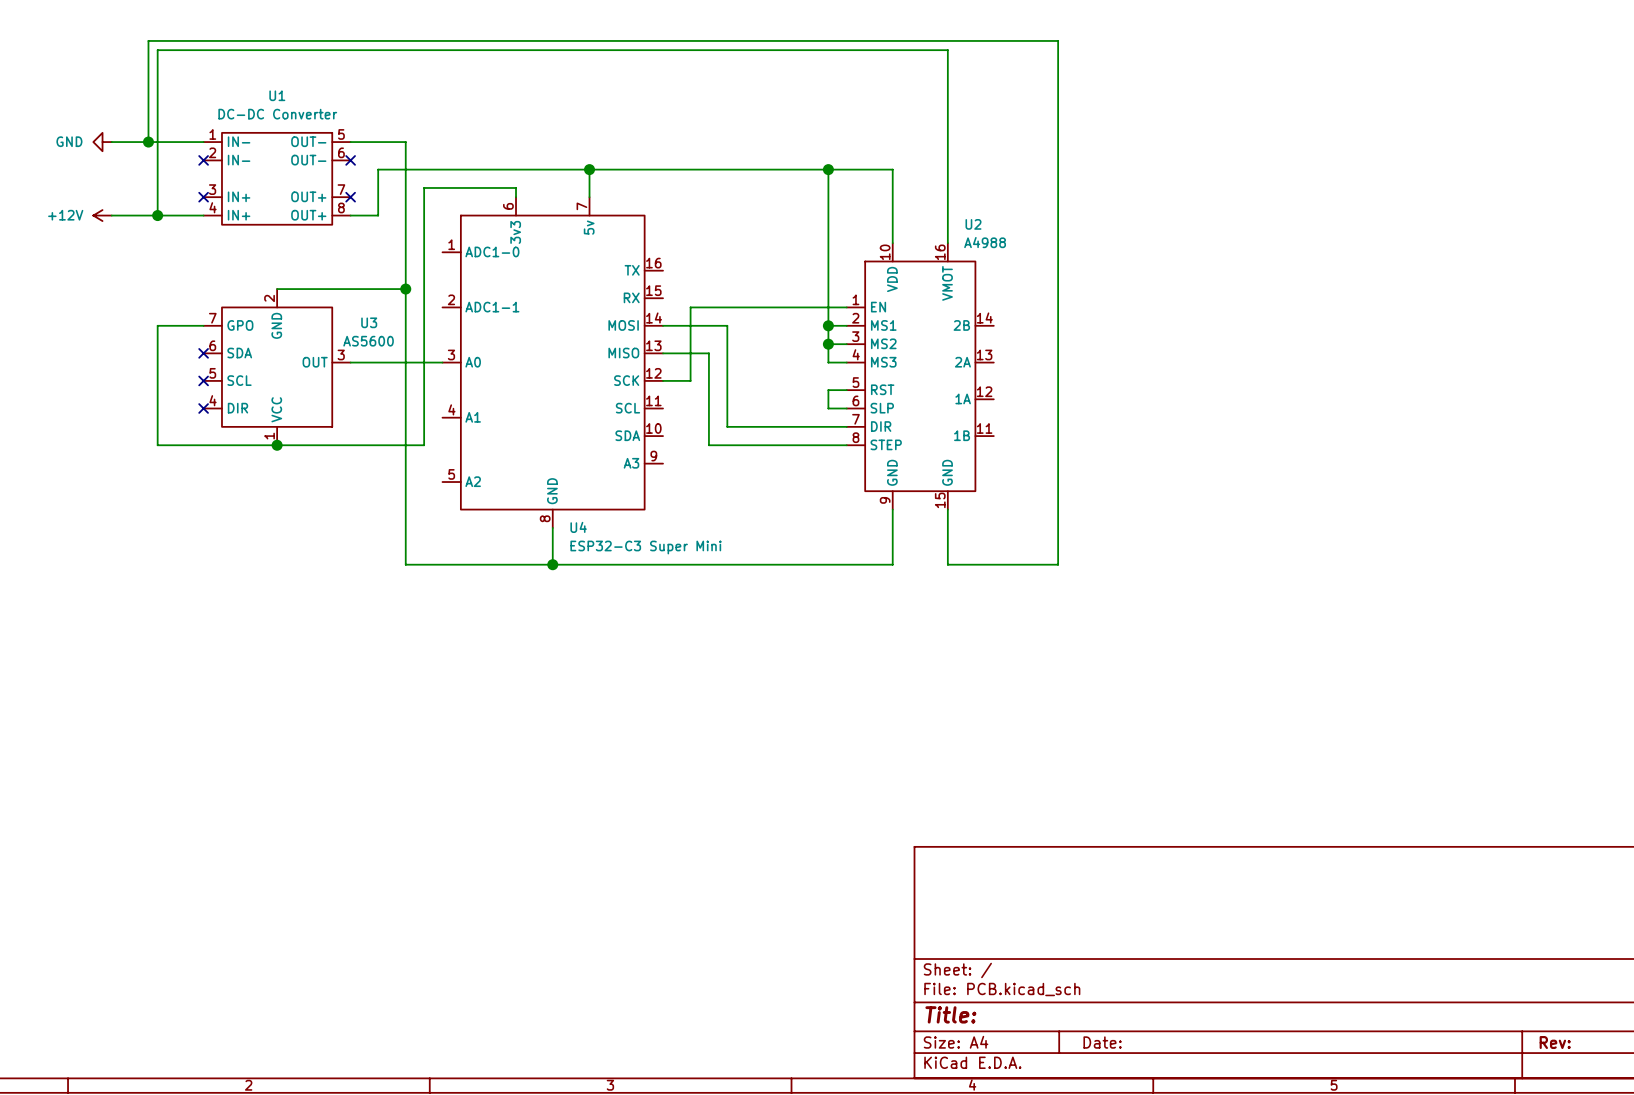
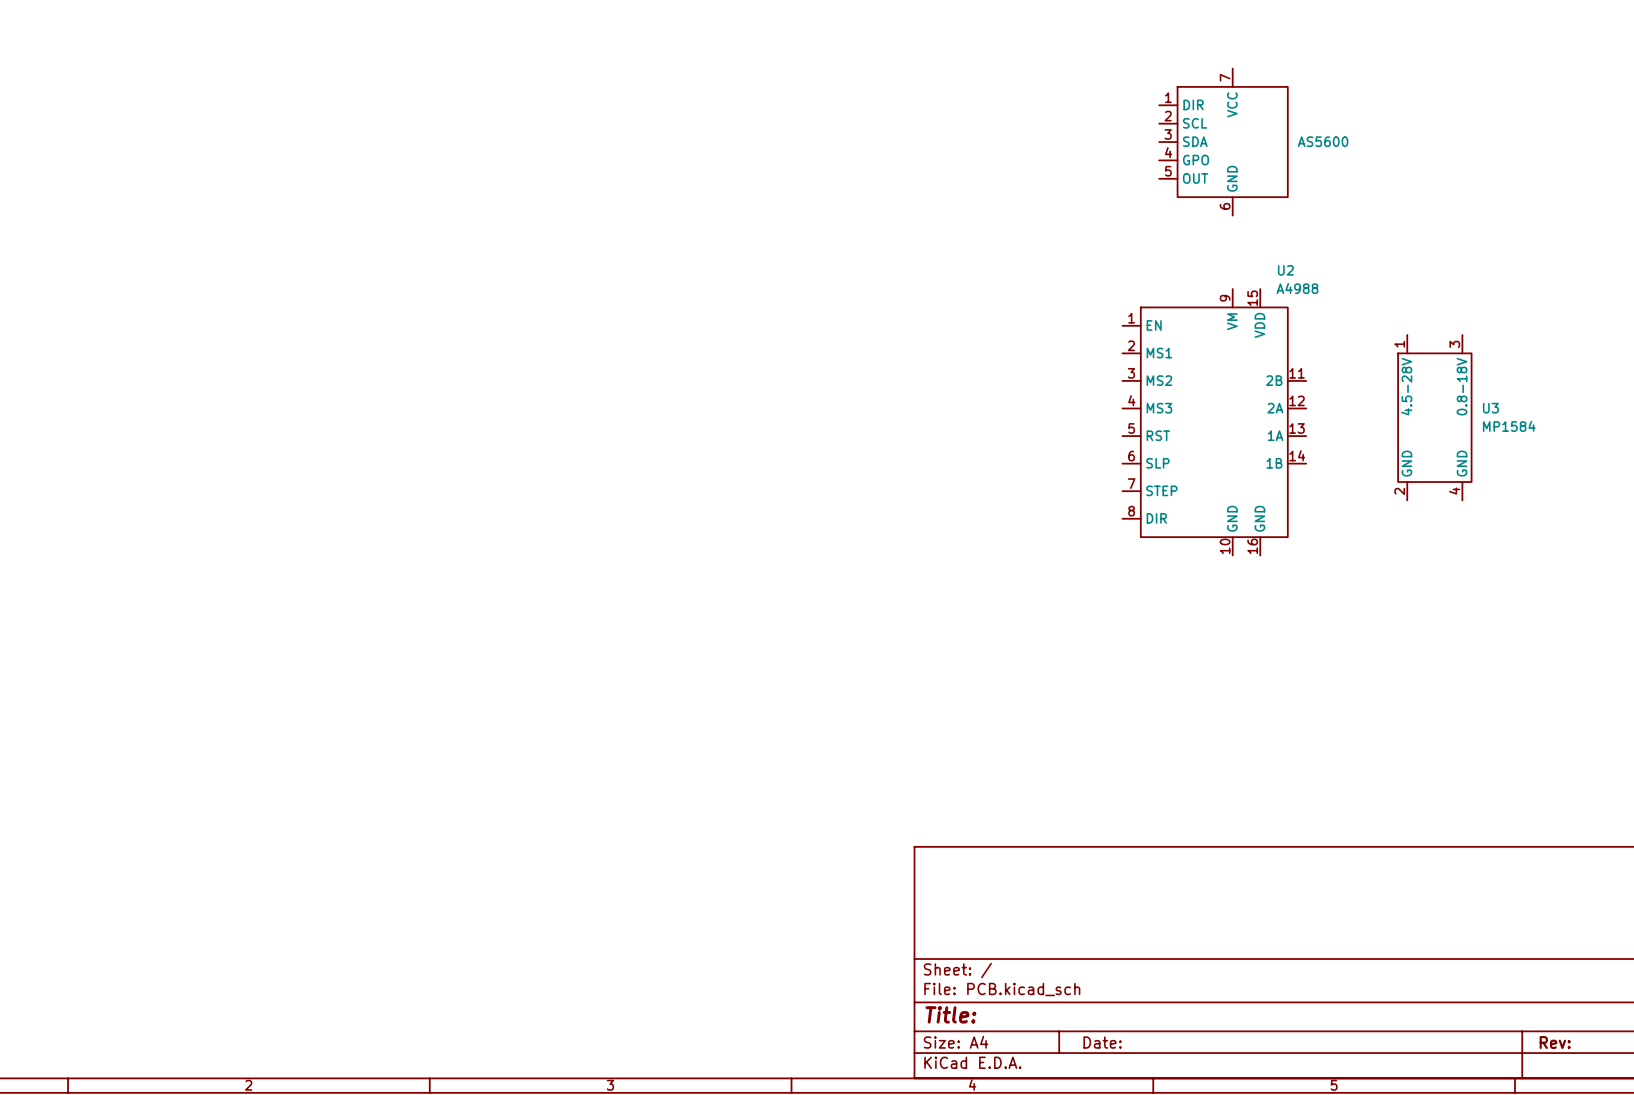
power symbol: GND (102, 142) -> none
wire: (111, 142) (203, 142) -> none
wire: (148, 142) (148, 40) (1058, 40) (1058, 564) (947, 564) (947, 509) -> none
junction: (148, 142) -> none
wire: (350, 142) (405, 142) (405, 564) (892, 564) (892, 509) -> none
part: none -> AS5600 (1223, 142)
no-connect mark: (203, 160) -> none
no-connect mark: (350, 160) -> none
wire: (589, 169) (589, 197) -> none
junction: (589, 169) -> none
wire: (828, 169) (828, 362) (846, 362) -> none
junction: (828, 169) -> none
U1: DC-DC Converter (277, 178) -> none
no-connect mark: (203, 197) -> none
no-connect mark: (350, 197) -> none
wire: (516, 197) (516, 187) (424, 187) (424, 445) (157, 445) (157, 325) (203, 325) -> none
power symbol: +12V (102, 215) -> none
wire: (111, 215) (203, 215) -> none
wire: (157, 215) (157, 50) (947, 50) (947, 243) -> none
junction: (157, 215) -> none
wire: (350, 215) (378, 215) (378, 169) (892, 169) (892, 243) -> none
U2 name position: U2 (973, 224) -> U2 (1285, 270)
U2 value position: A4988 (985, 242) -> A4988 (1297, 288)
U2 symbol: [846, 243, 994, 510] -> [1122, 289, 1307, 556]
U3 symbol: [203, 289, 351, 446] -> [1398, 335, 1472, 501]
wire: (277, 289) (405, 289) -> none
junction: (405, 289) -> none
wire: (846, 307) (690, 307) (690, 380) (663, 380) -> none
U3 name position: U3 (369, 322) -> U3 (1490, 408)
wire: (663, 325) (727, 325) (727, 426) (846, 426) -> none
wire: (828, 325) (846, 325) -> none
junction: (828, 325) -> none
U3 value: AS5600 (368, 341) -> MP1584 (1509, 426)
wire: (828, 344) (846, 344) -> none
junction: (828, 344) -> none
no-connect mark: (203, 353) -> none
wire: (663, 353) (708, 353) (708, 445) (846, 445) -> none
wire: (350, 362) (442, 362) -> none
U4: ESP32-C3 Super Mini (552, 362) -> none
no-connect mark: (203, 380) -> none
wire: (846, 390) (828, 390) (828, 408) (846, 408) -> none
no-connect mark: (203, 408) -> none
junction: (277, 445) -> none
wire: (552, 527) (552, 564) -> none
junction: (552, 564) -> none

